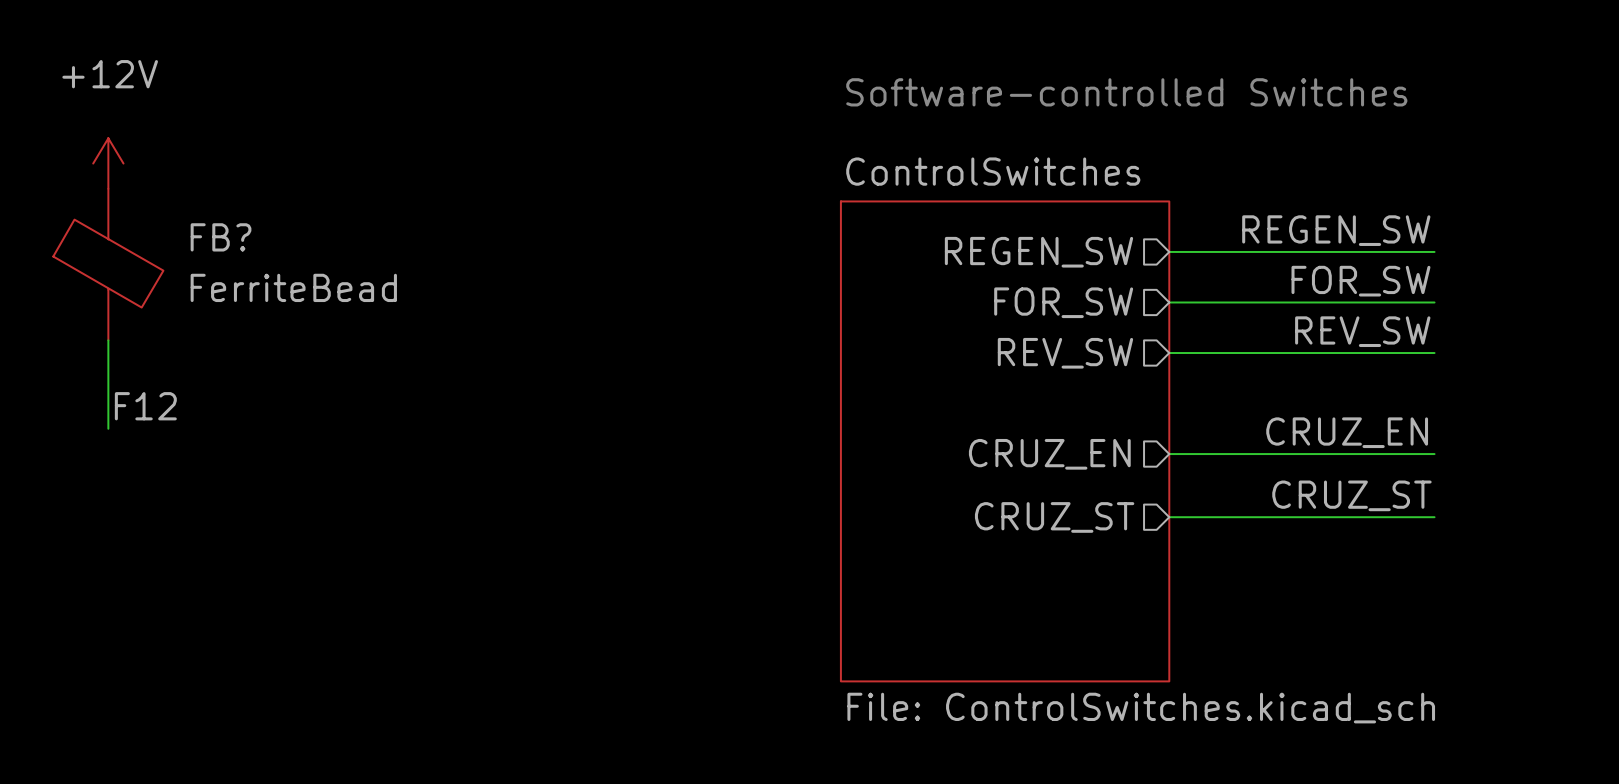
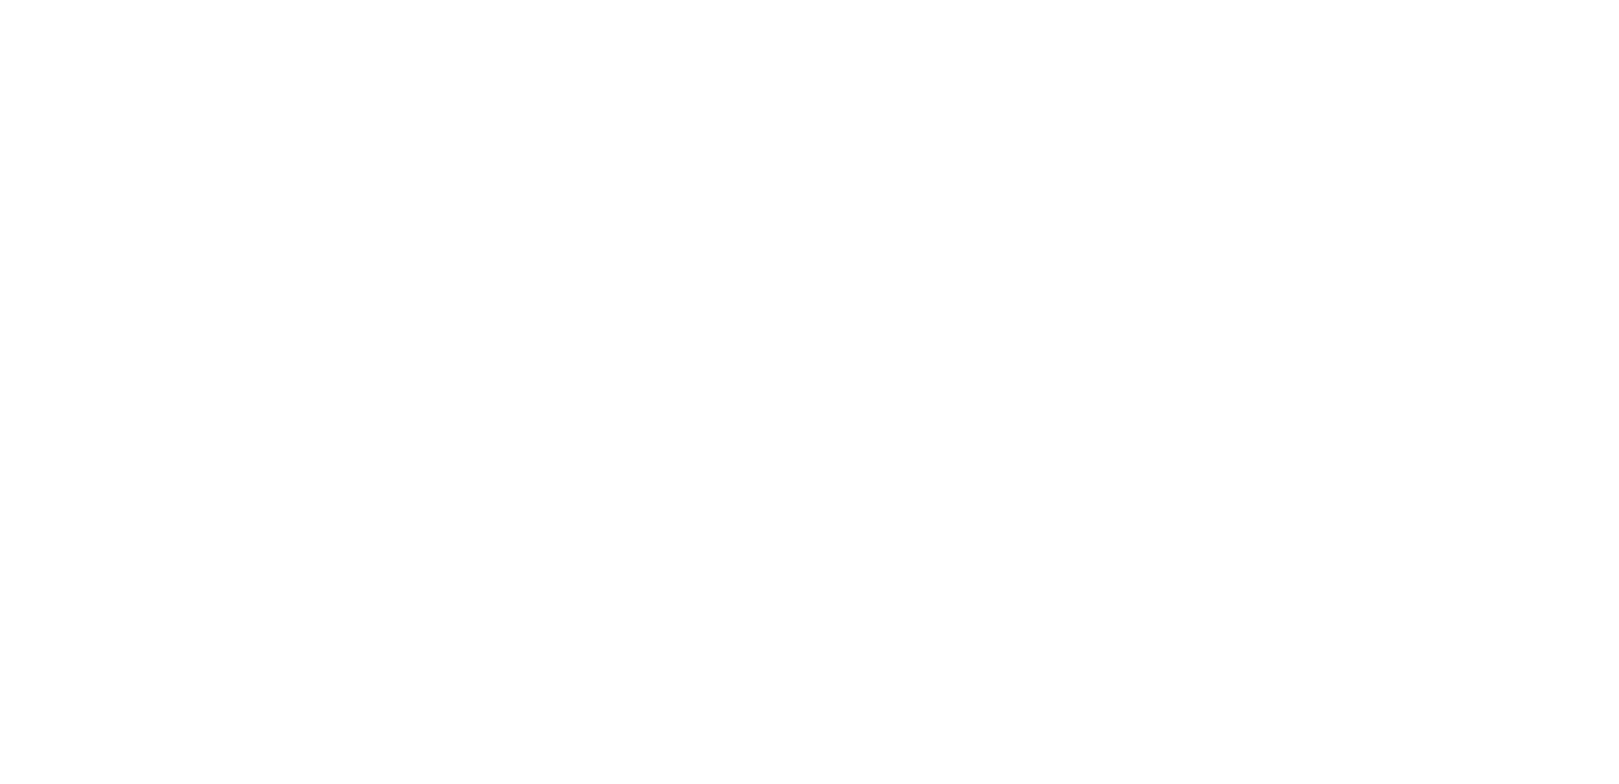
text: Software-controlled Switches (1126, 92) -> none
power symbol: +12V (108, 163) -> none
label: REGEN_SW (1336, 230) -> none
wire: (1169, 251) (1434, 251) -> none
sheet pin: REGEN_SW (1038, 252) -> none
FB?: FerriteBead (108, 264) -> none
label: FOR_SW (1360, 281) -> none
sheet pin: FOR_SW (1063, 302) -> none
wire: (1169, 302) (1434, 302) -> none
label: REV_SW (1362, 331) -> none
wire: (108, 340) (108, 428) -> none
sheet pin: REV_SW (1065, 353) -> none
wire: (1169, 353) (1434, 353) -> none
label: F12 (145, 406) -> none
label: CRUZ_EN (1347, 432) -> none
sheet ControlSwitches: File: ControlSwitches.kicad_sch (1005, 441) -> none
sheet pin: CRUZ_EN (1049, 454) -> none
wire: (1169, 454) (1434, 454) -> none
label: CRUZ_ST (1351, 495) -> none
sheet pin: CRUZ_ST (1054, 517) -> none
wire: (1169, 517) (1434, 517) -> none

